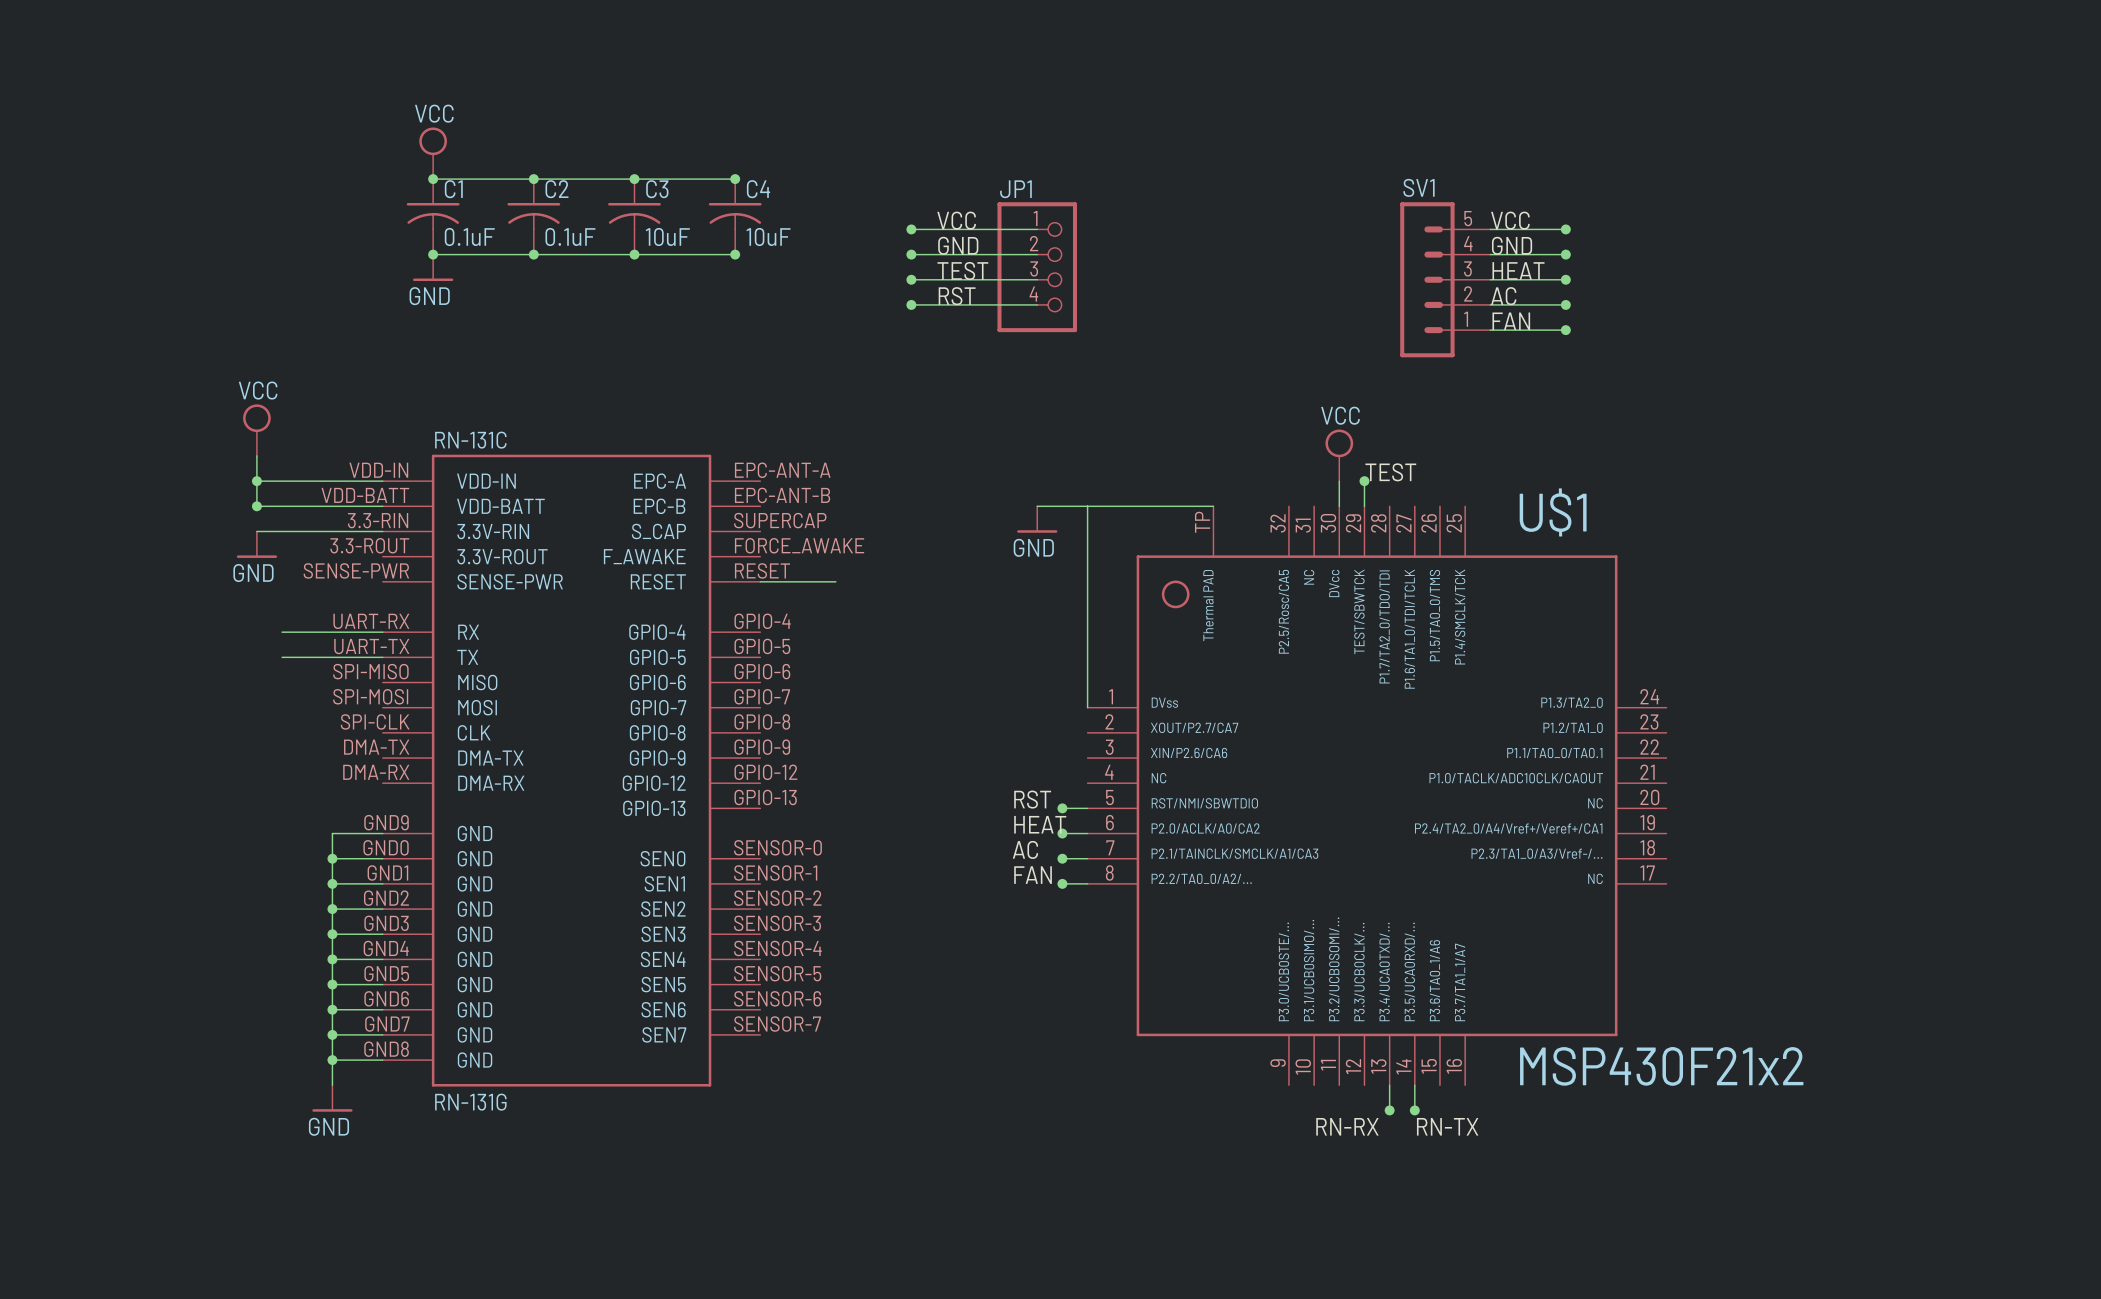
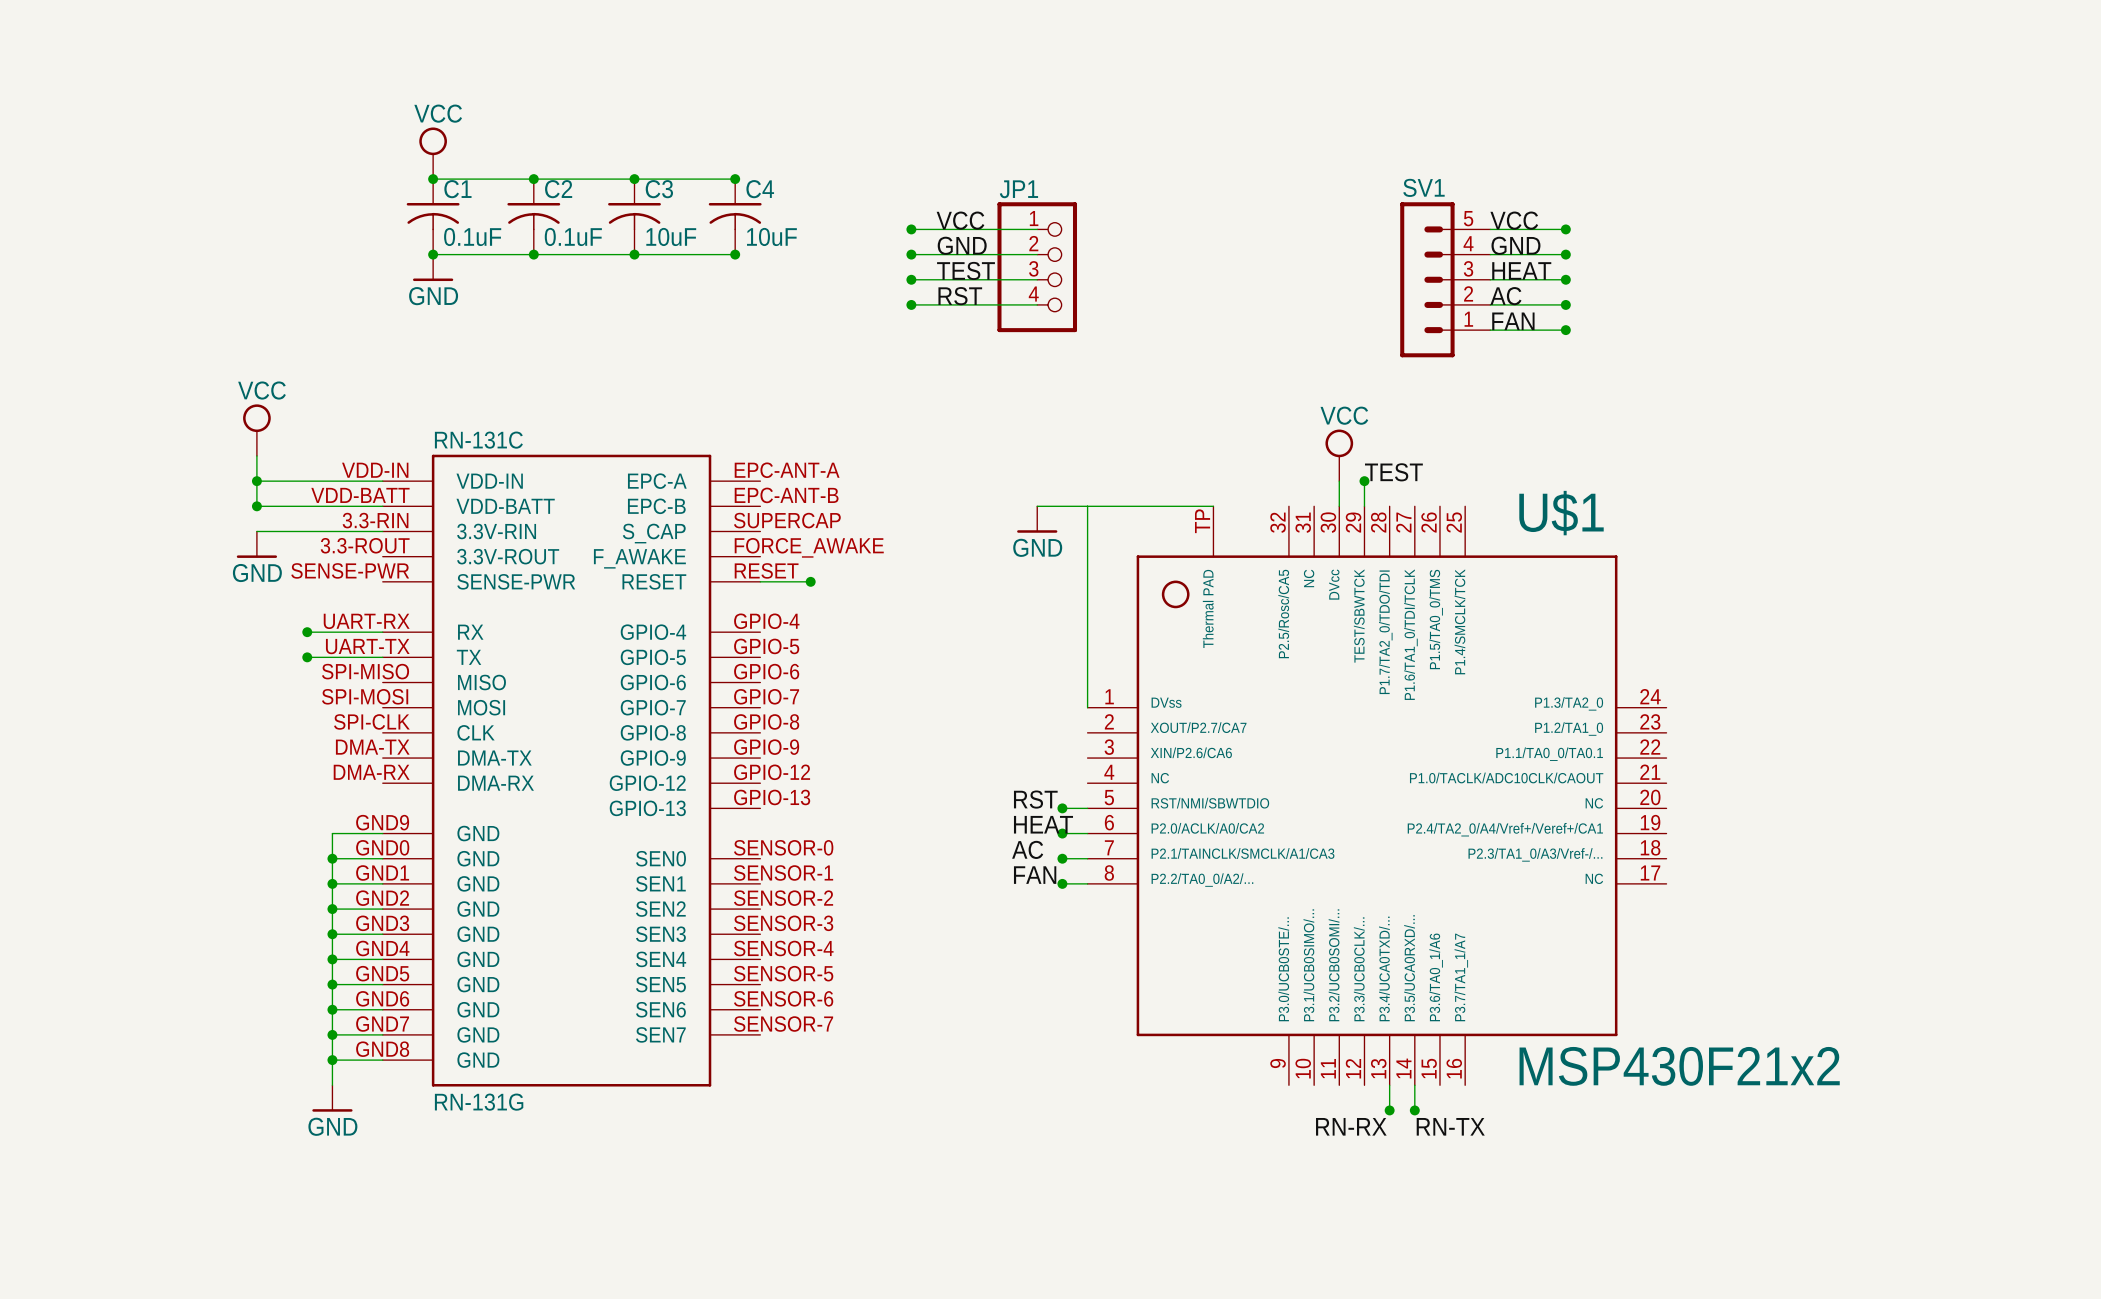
wire: (810, 581) (835, 581) -> none
junction: none -> (810, 581)
wire: (282, 632) (307, 632) -> none
junction: none -> (307, 632)
wire: (282, 657) (307, 657) -> none
junction: none -> (307, 657)

